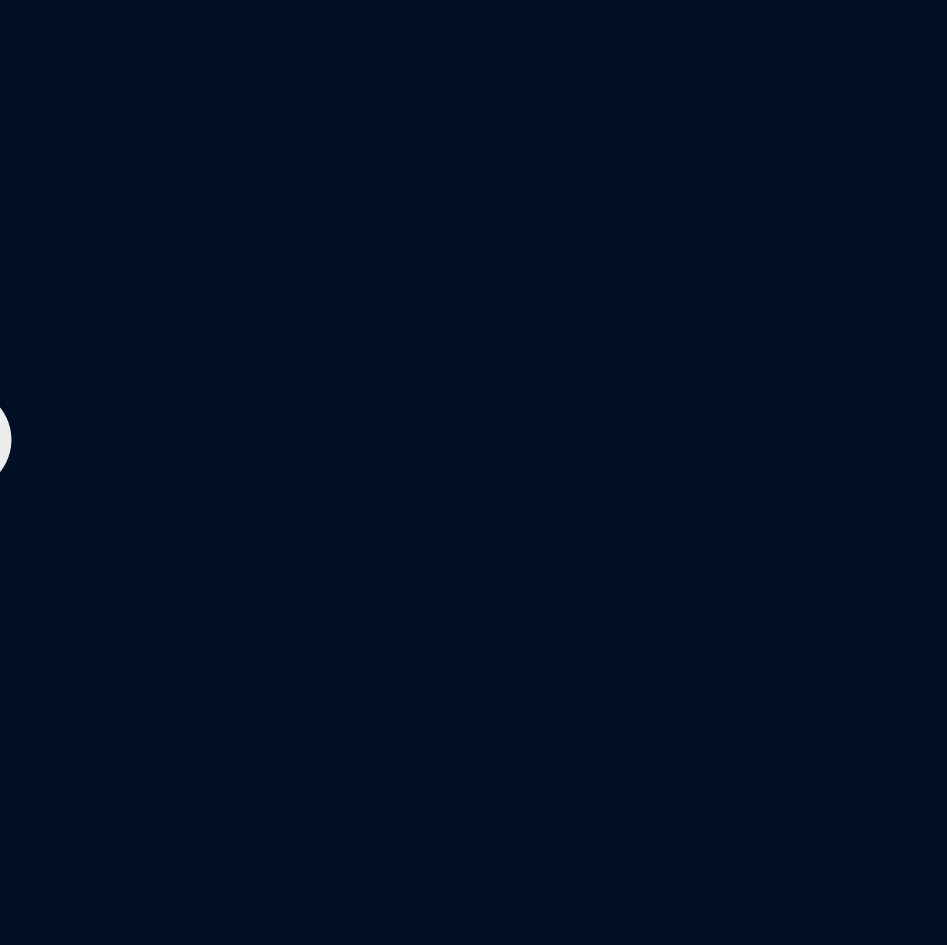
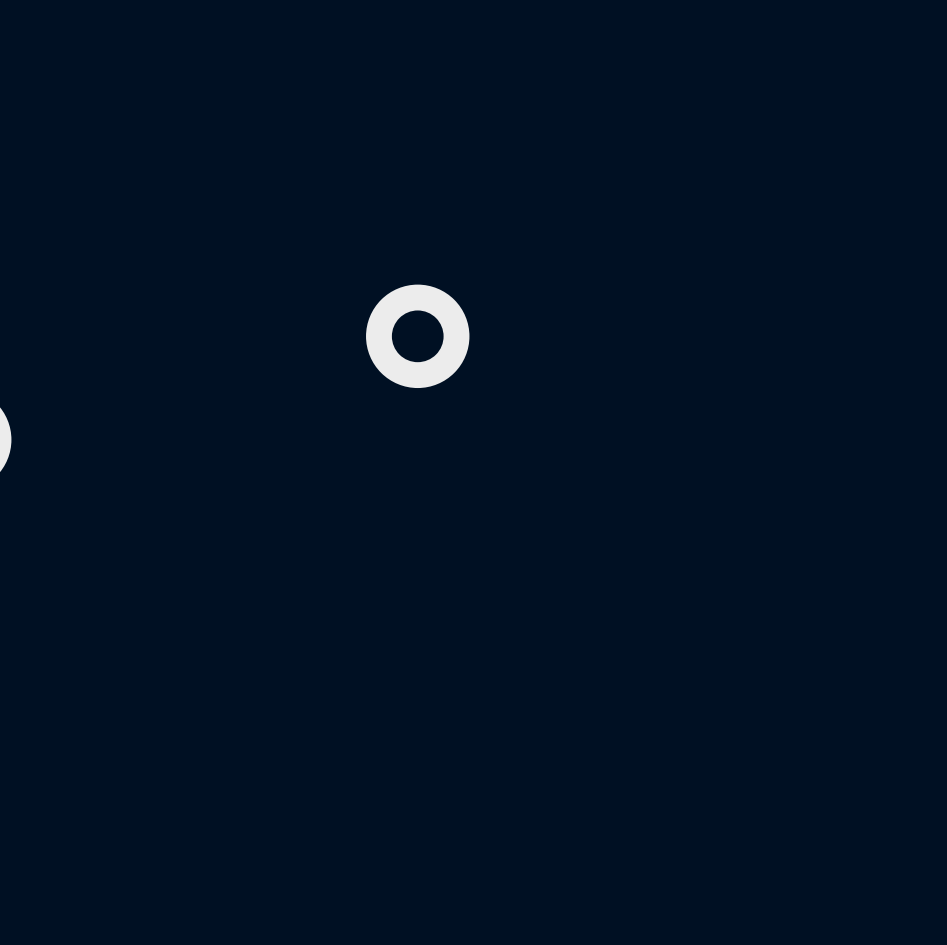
via: none -> (417, 336)

